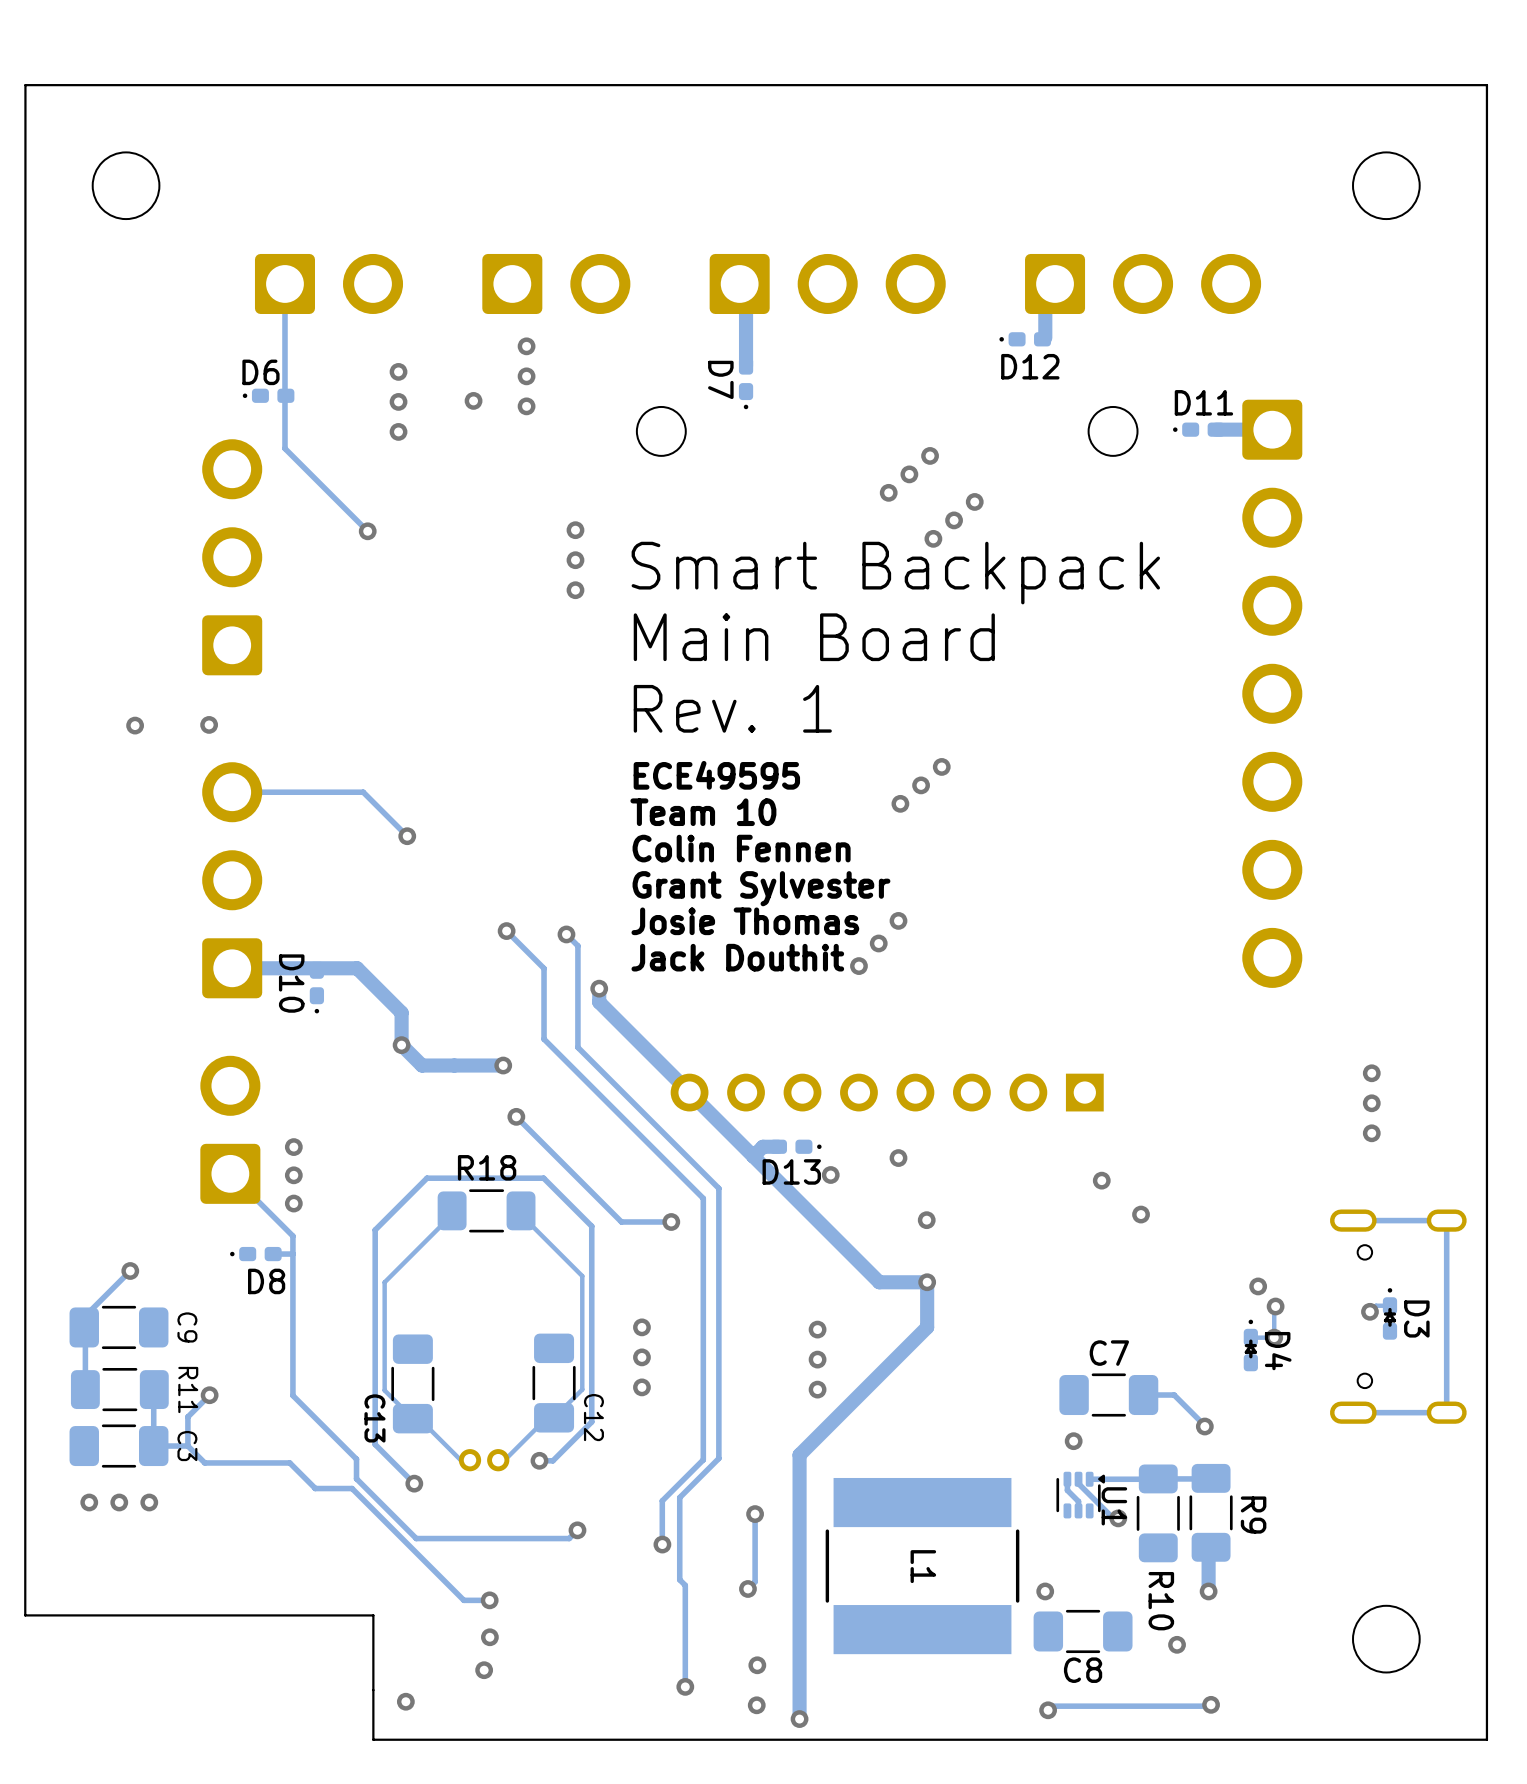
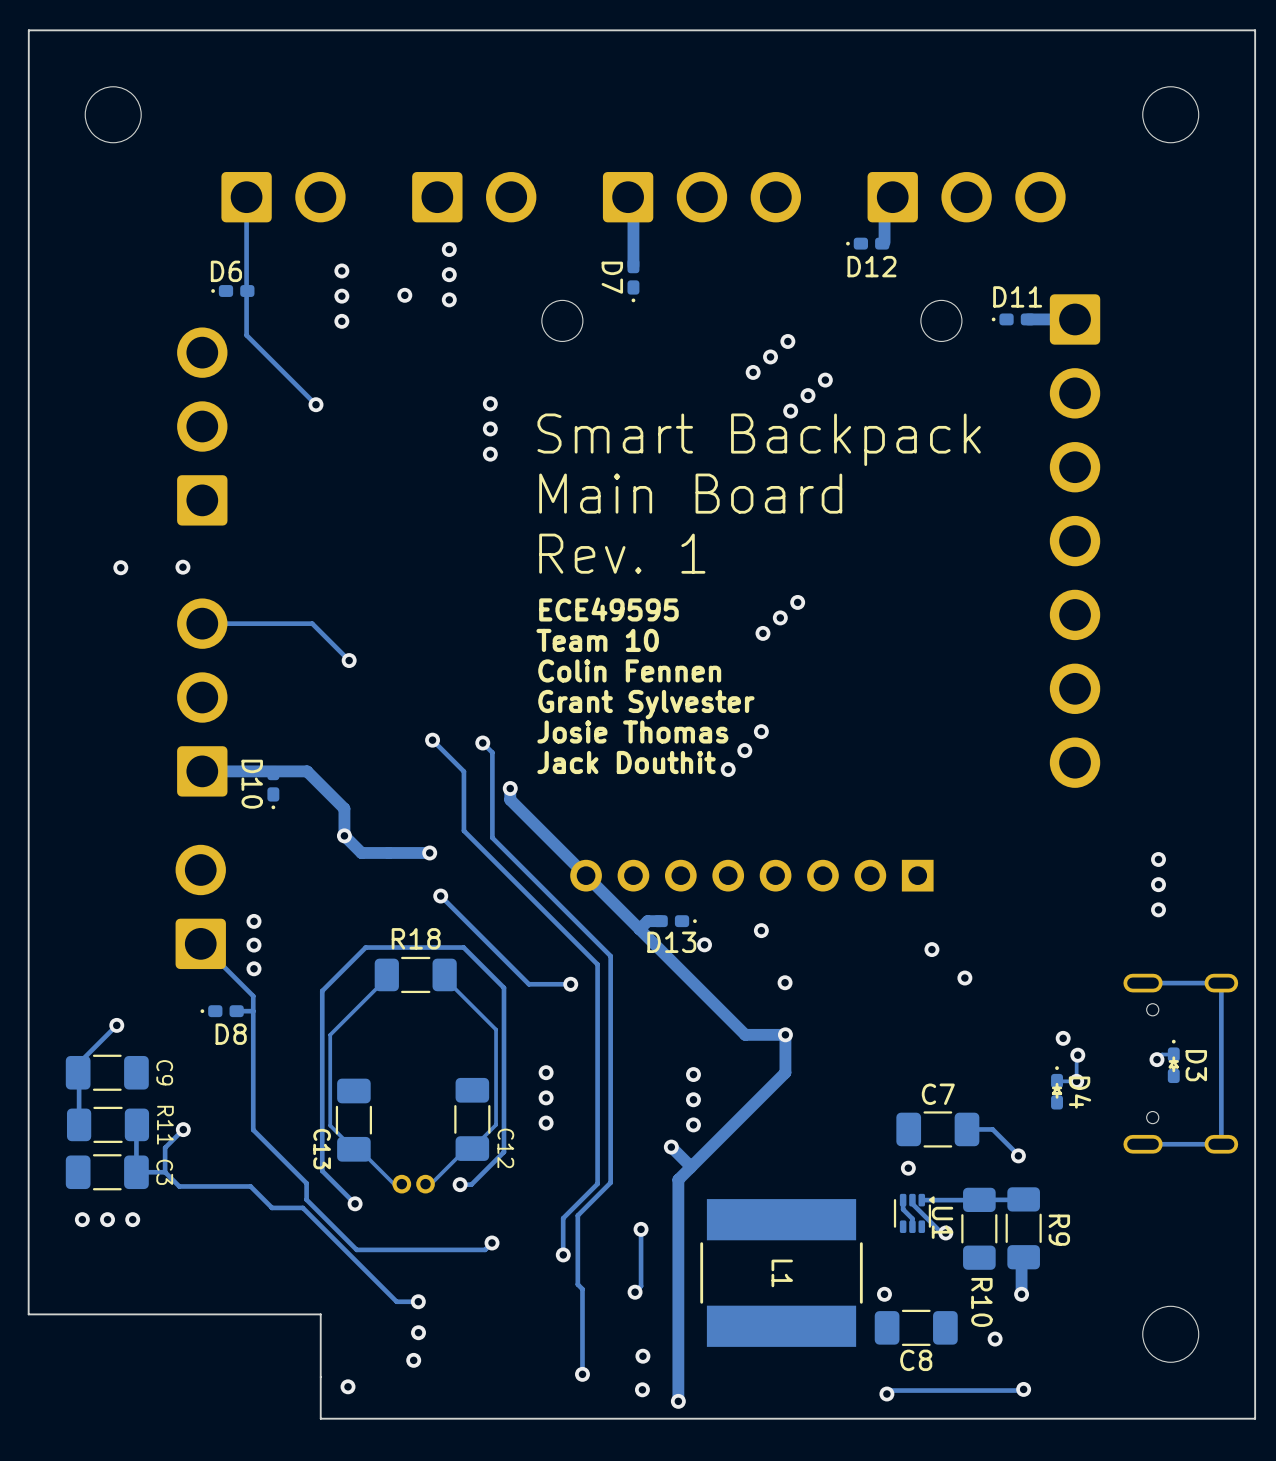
track: none -> (671, 1147) (690, 1167)
via: none -> (671, 1147)

